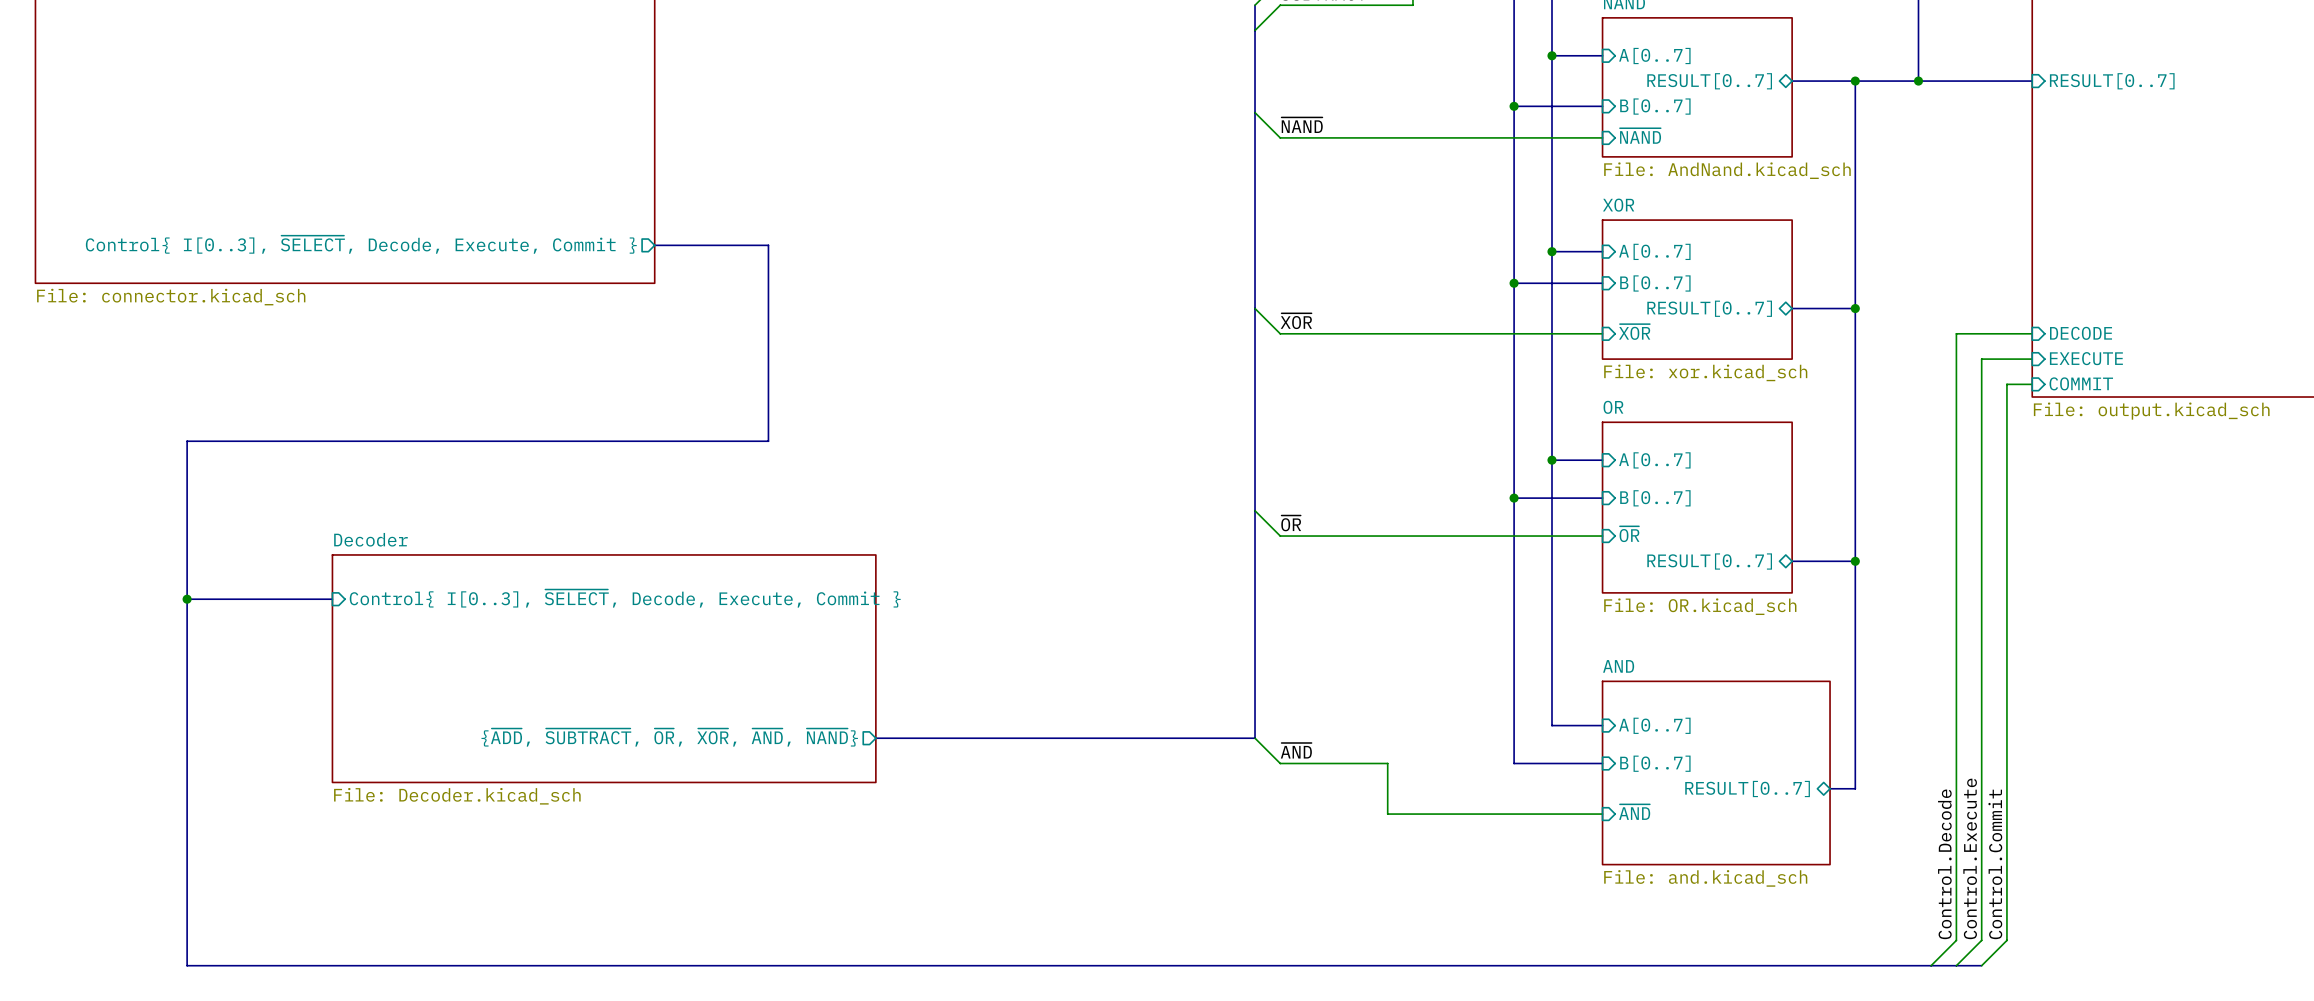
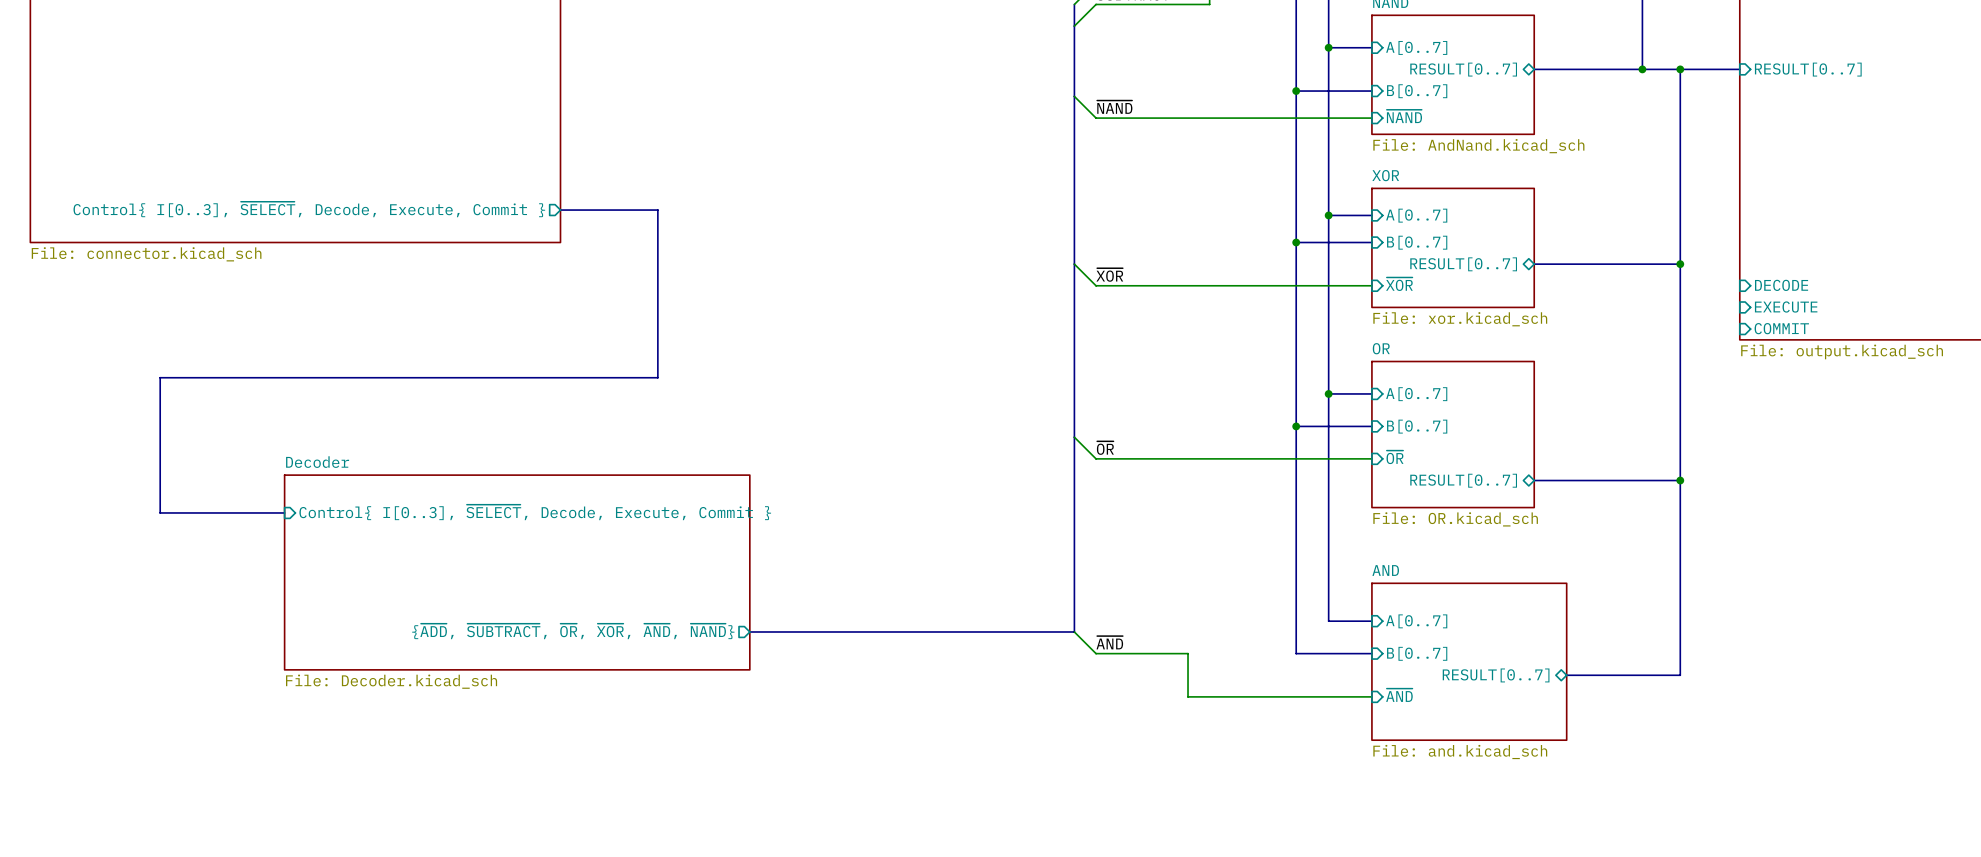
bus: (1855, 81) (1855, 788) -> (1680, 69) (1680, 675) (1588, 675)
junction: (1855, 81) -> none
junction: none -> (1680, 69)
bus: none -> (1588, 264) (1680, 264)
junction: (1855, 308) -> none
junction: none -> (1680, 264)
wire: (2032, 333) (1956, 333) (1956, 940) (1931, 965) -> none
wire: (2032, 359) (1981, 359) (1981, 940) (1956, 965) -> none
wire: (2032, 384) (2006, 384) (2006, 940) (1981, 965) -> none
bus: none -> (1588, 480) (1680, 480)
junction: (1855, 561) -> none
junction: none -> (1680, 480)
bus: (187, 599) (187, 965) (1981, 965) -> none
junction: (187, 599) -> none
label: Control.Execute (1970, 858) -> none
label: Control.Decode (1944, 864) -> none
label: Control.Commit (1995, 864) -> none

